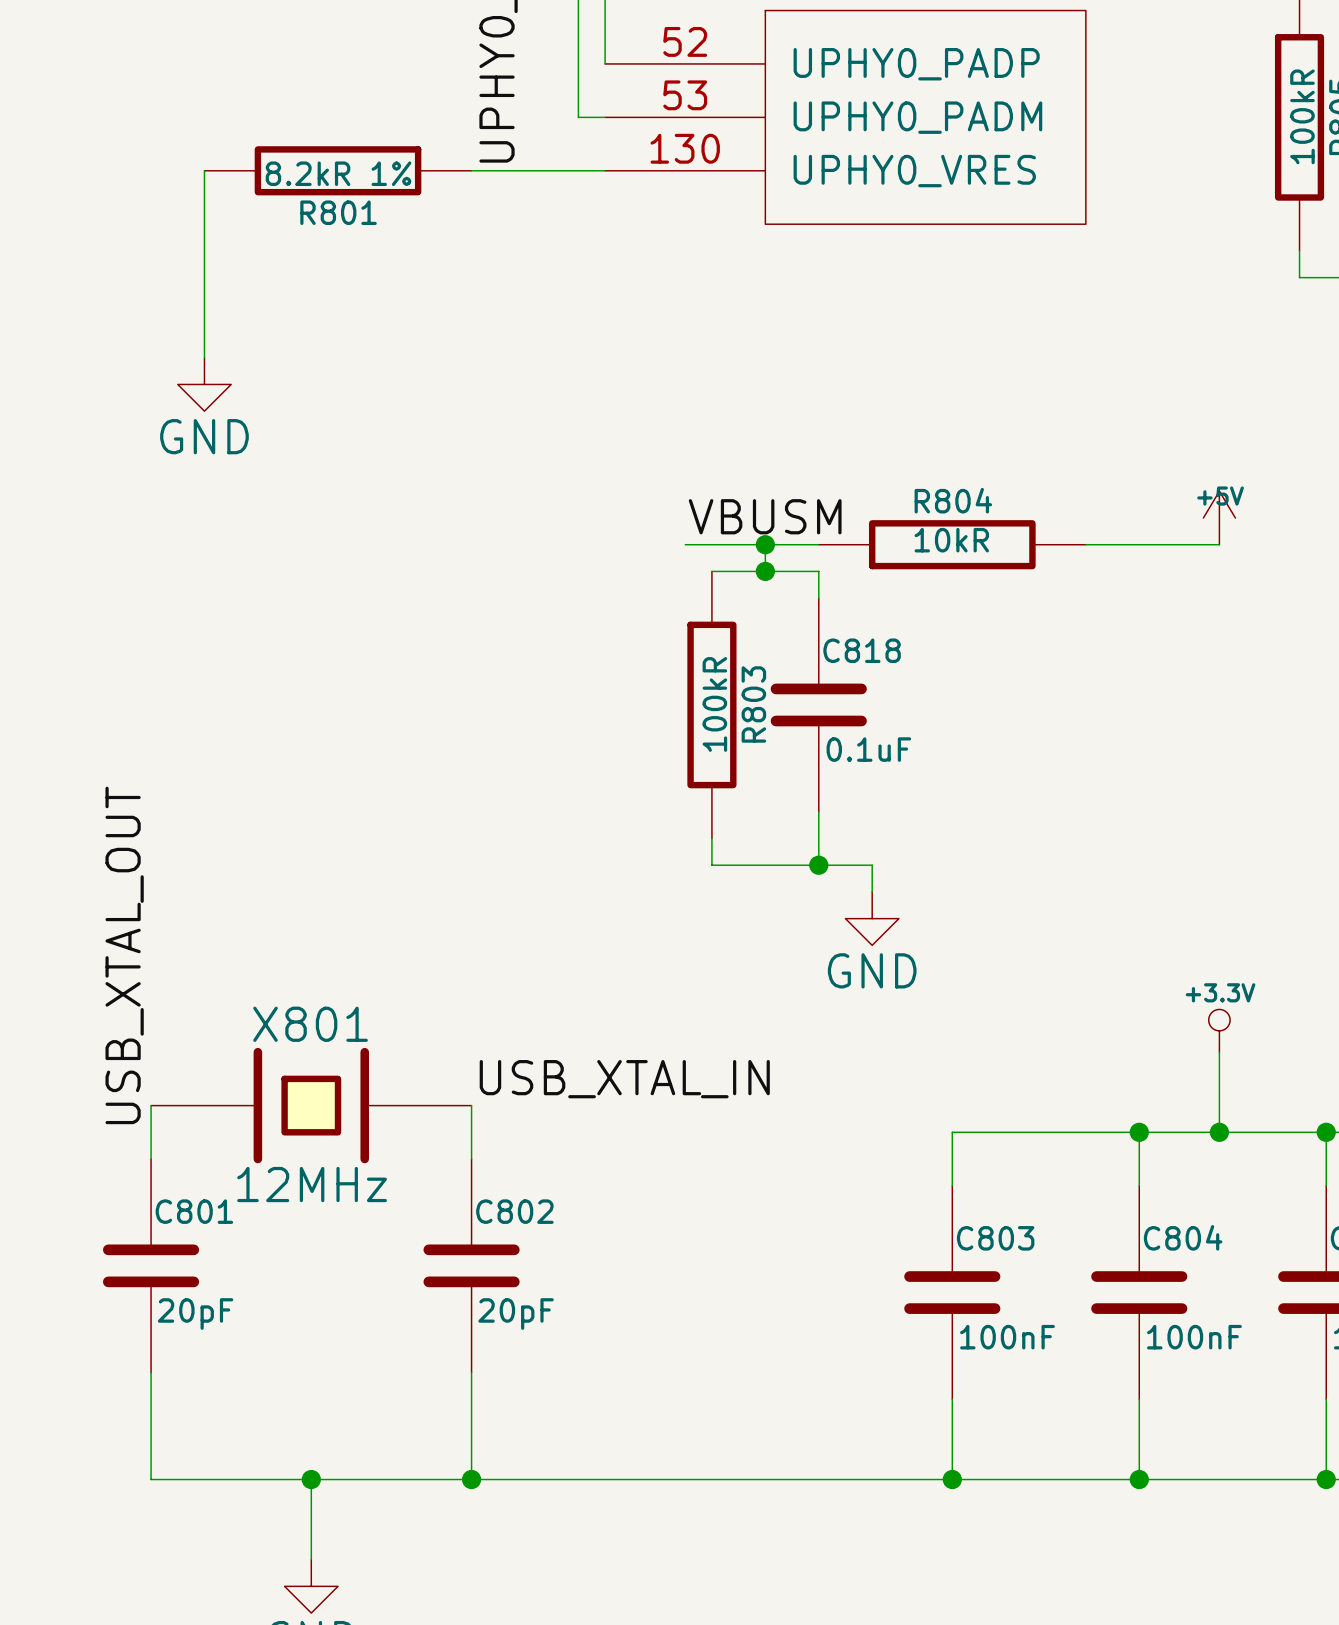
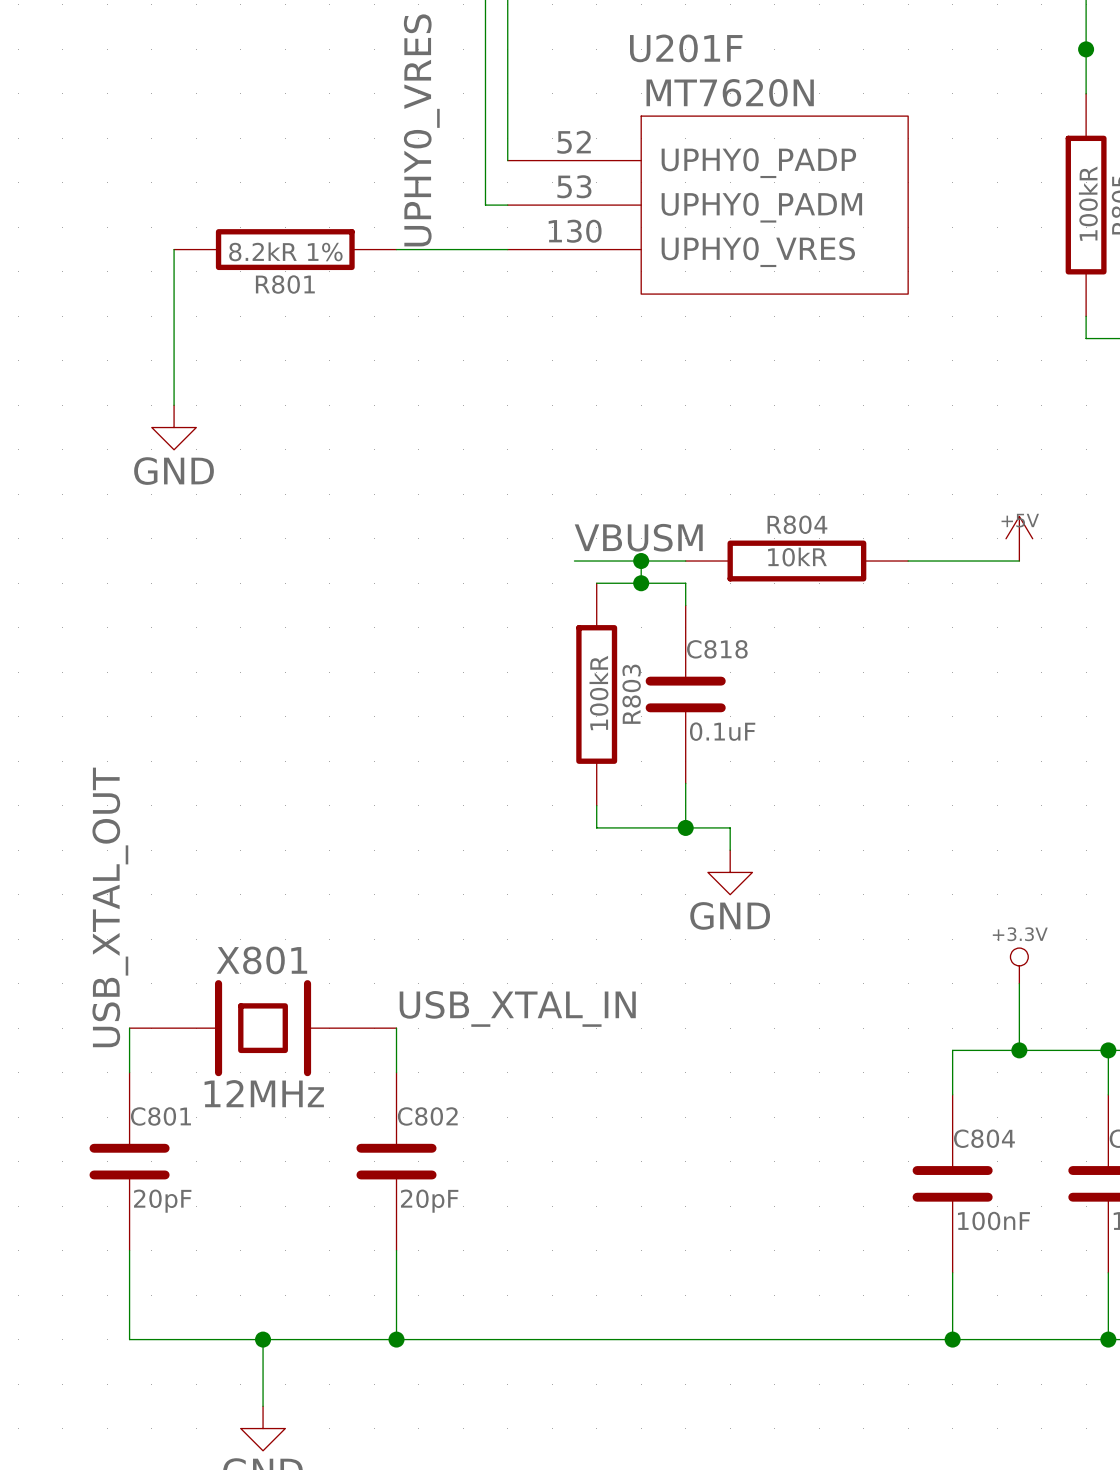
wire: (1139, 1132) (952, 1132) (952, 1185) -> none
junction: (1139, 1132) -> none
C803: 100nF (952, 1292) -> none
wire: (952, 1399) (952, 1479) -> none
junction: (952, 1479) -> none

